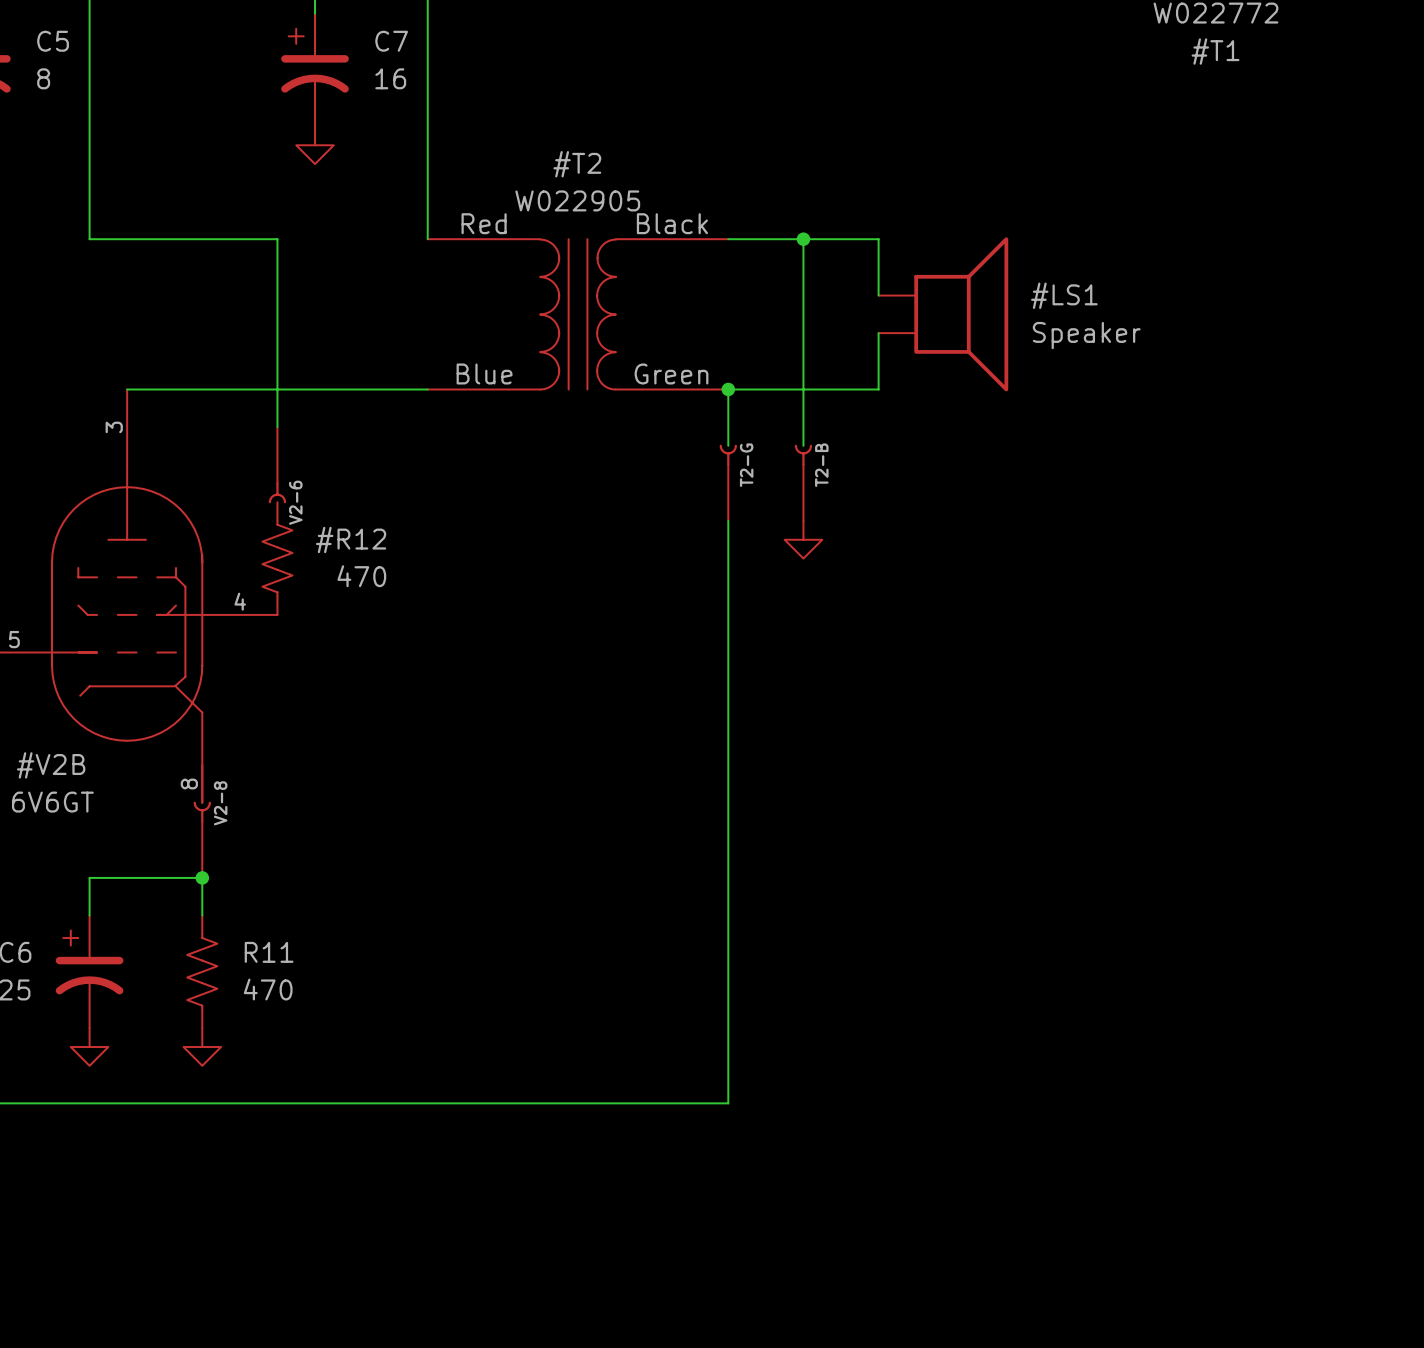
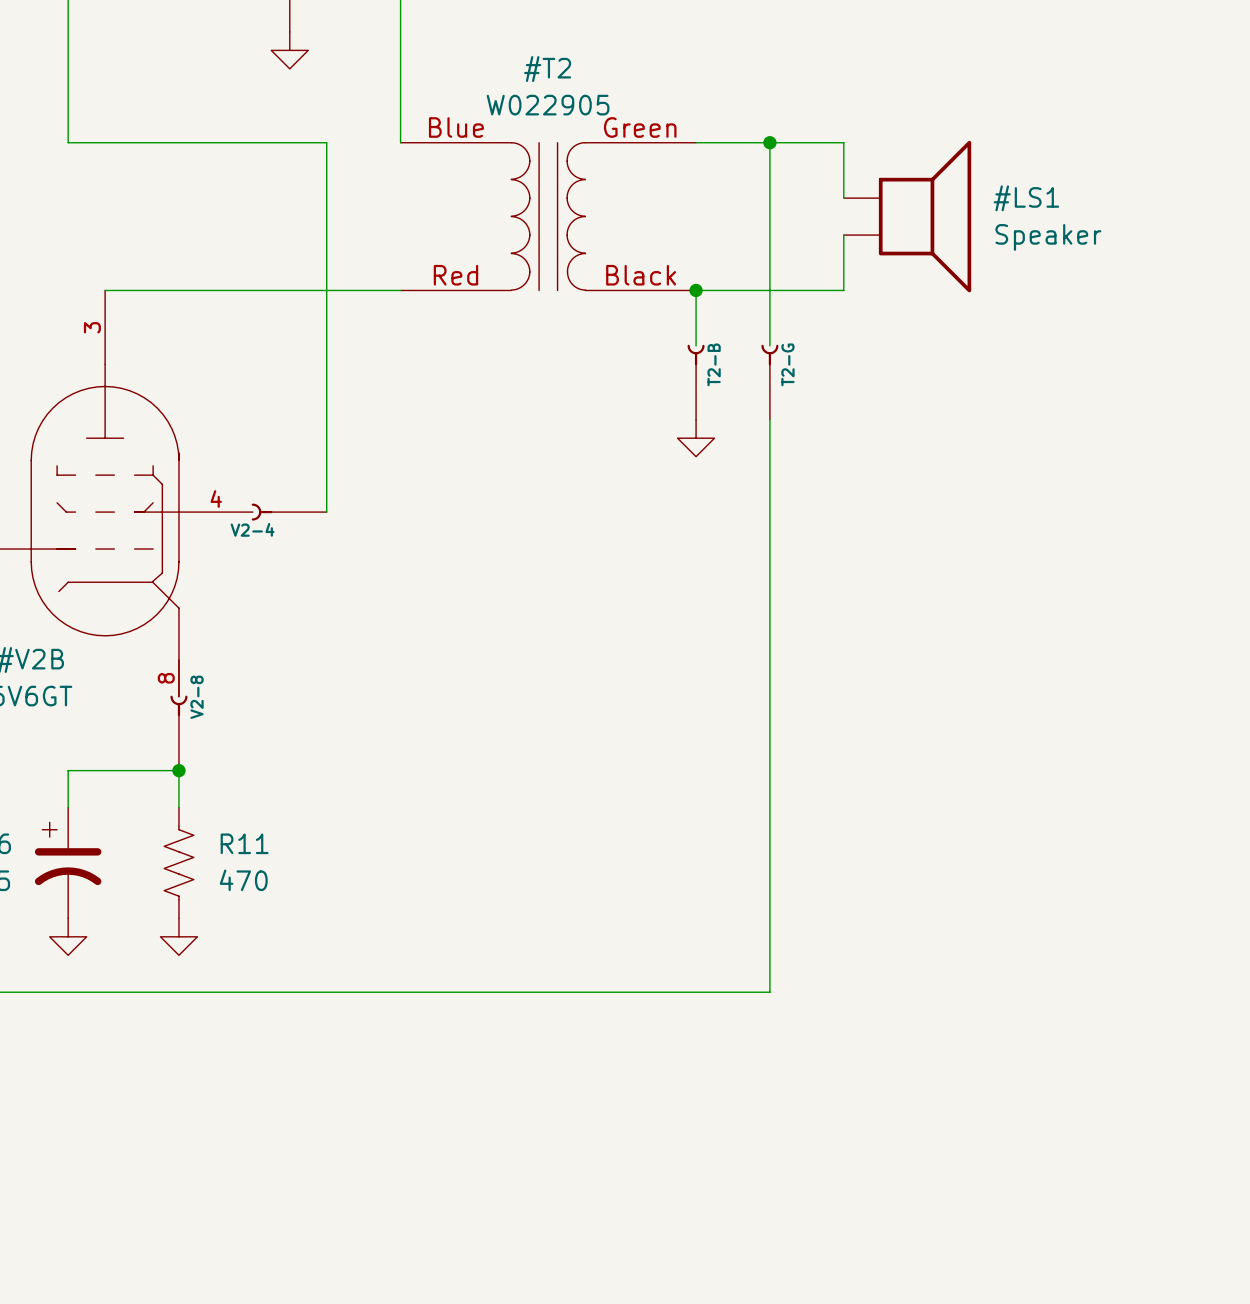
wire: (277, 239) (277, 427) -> (252, 142) (326, 142) (326, 512)
#T2 flip: as is (578, 314) -> up-down (548, 216)
part: V2-6 (277, 465) -> none
part value: T2-G (746, 465) -> T2-B (714, 364)
part value: T2-B (821, 465) -> T2-G (787, 364)
wire: (728, 520) (728, 1103) -> (769, 419) (769, 992) (696, 992)
power symbol position: (803, 539) -> (696, 438)
#R12: 470 (277, 558) -> none
part: none -> V2-4 (289, 512)

